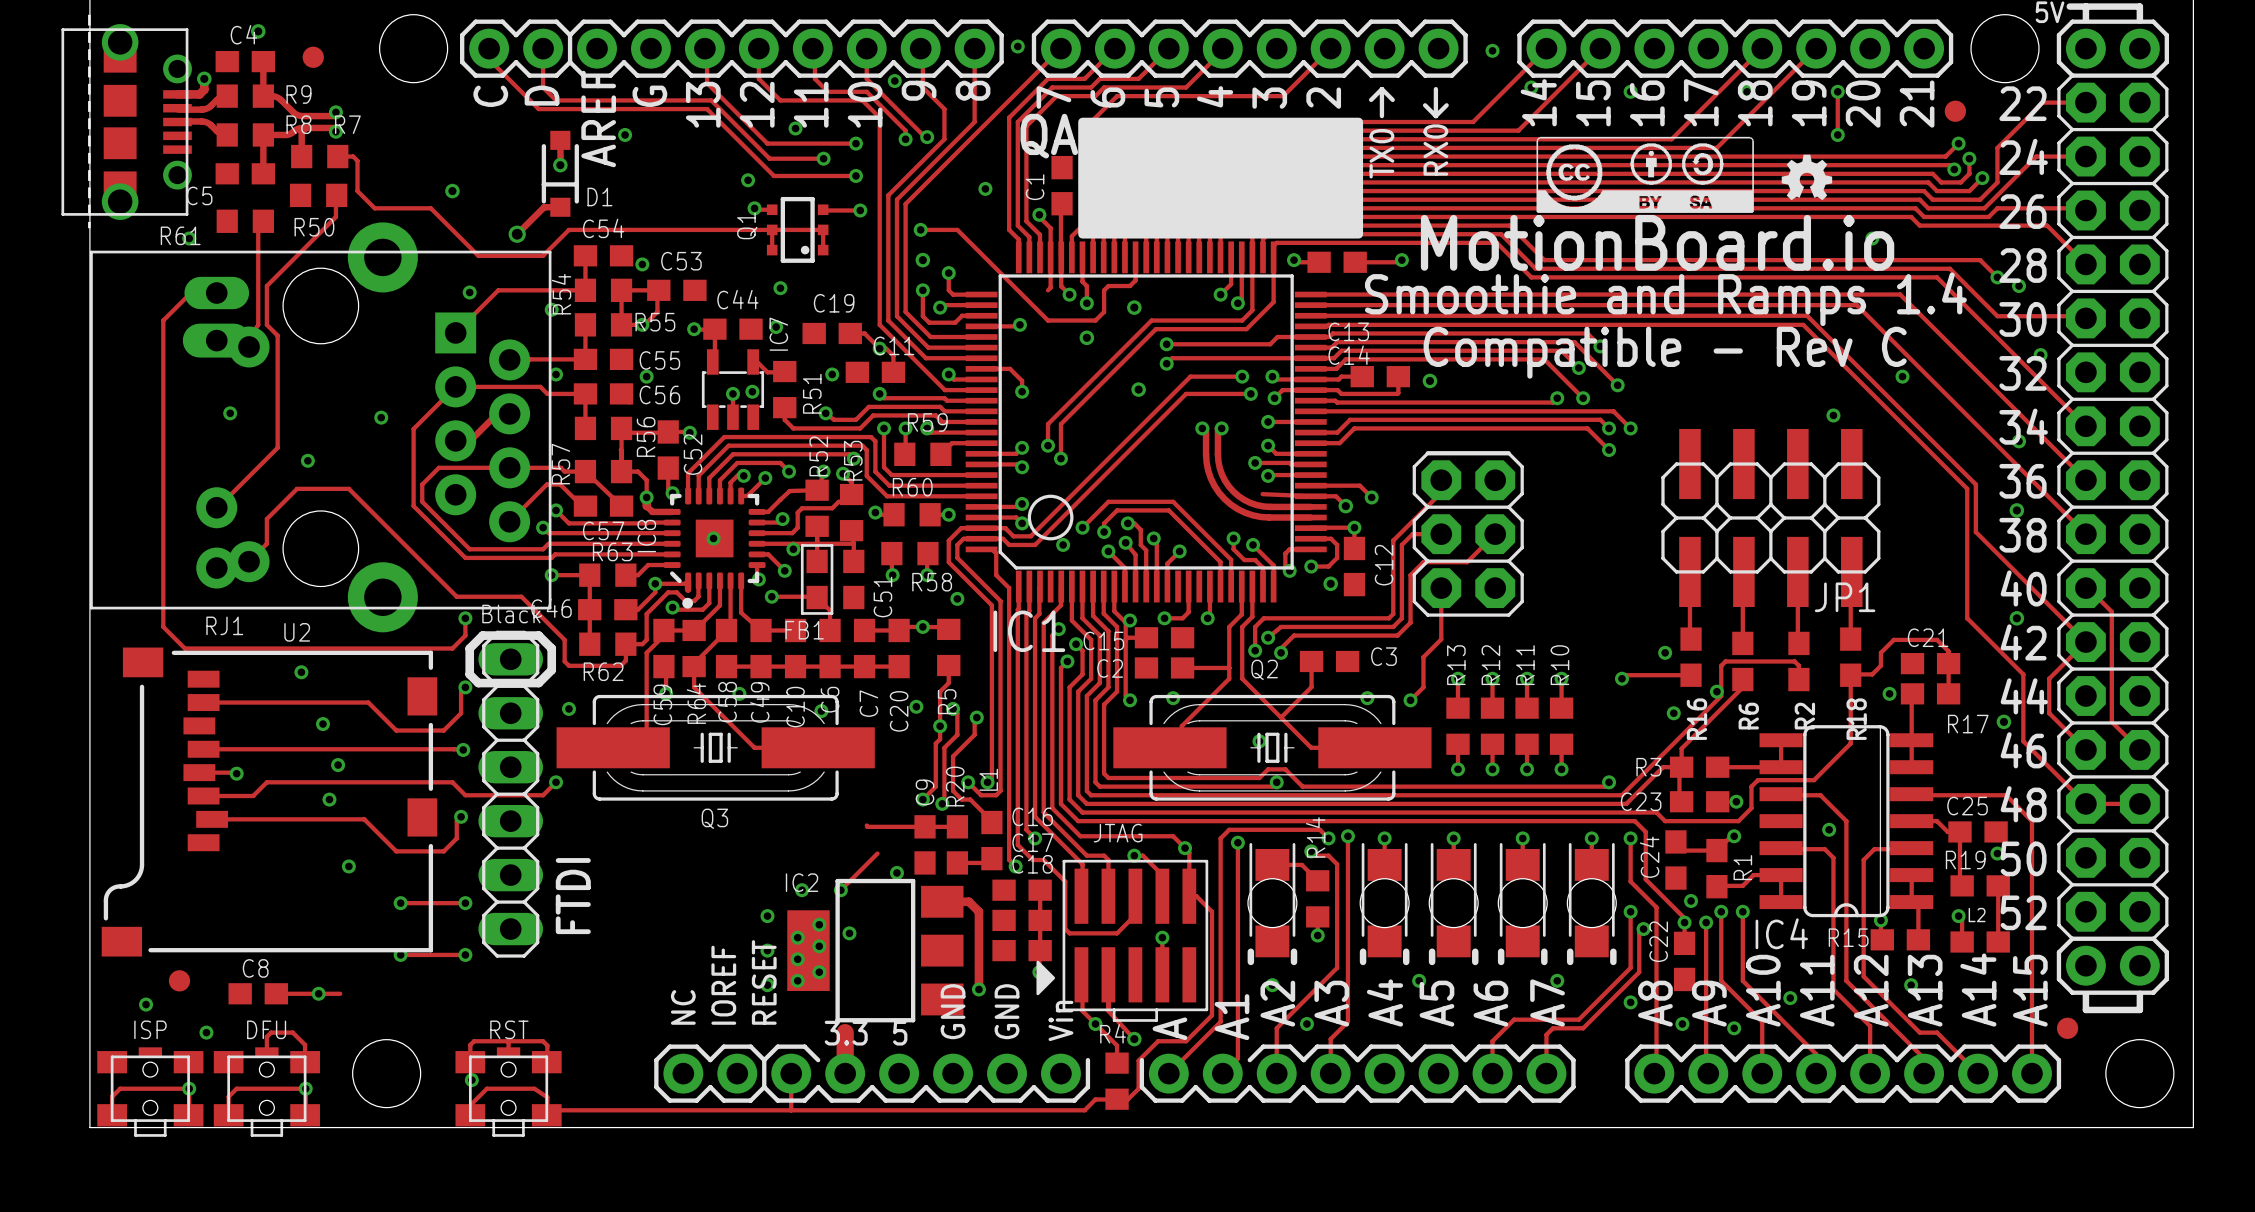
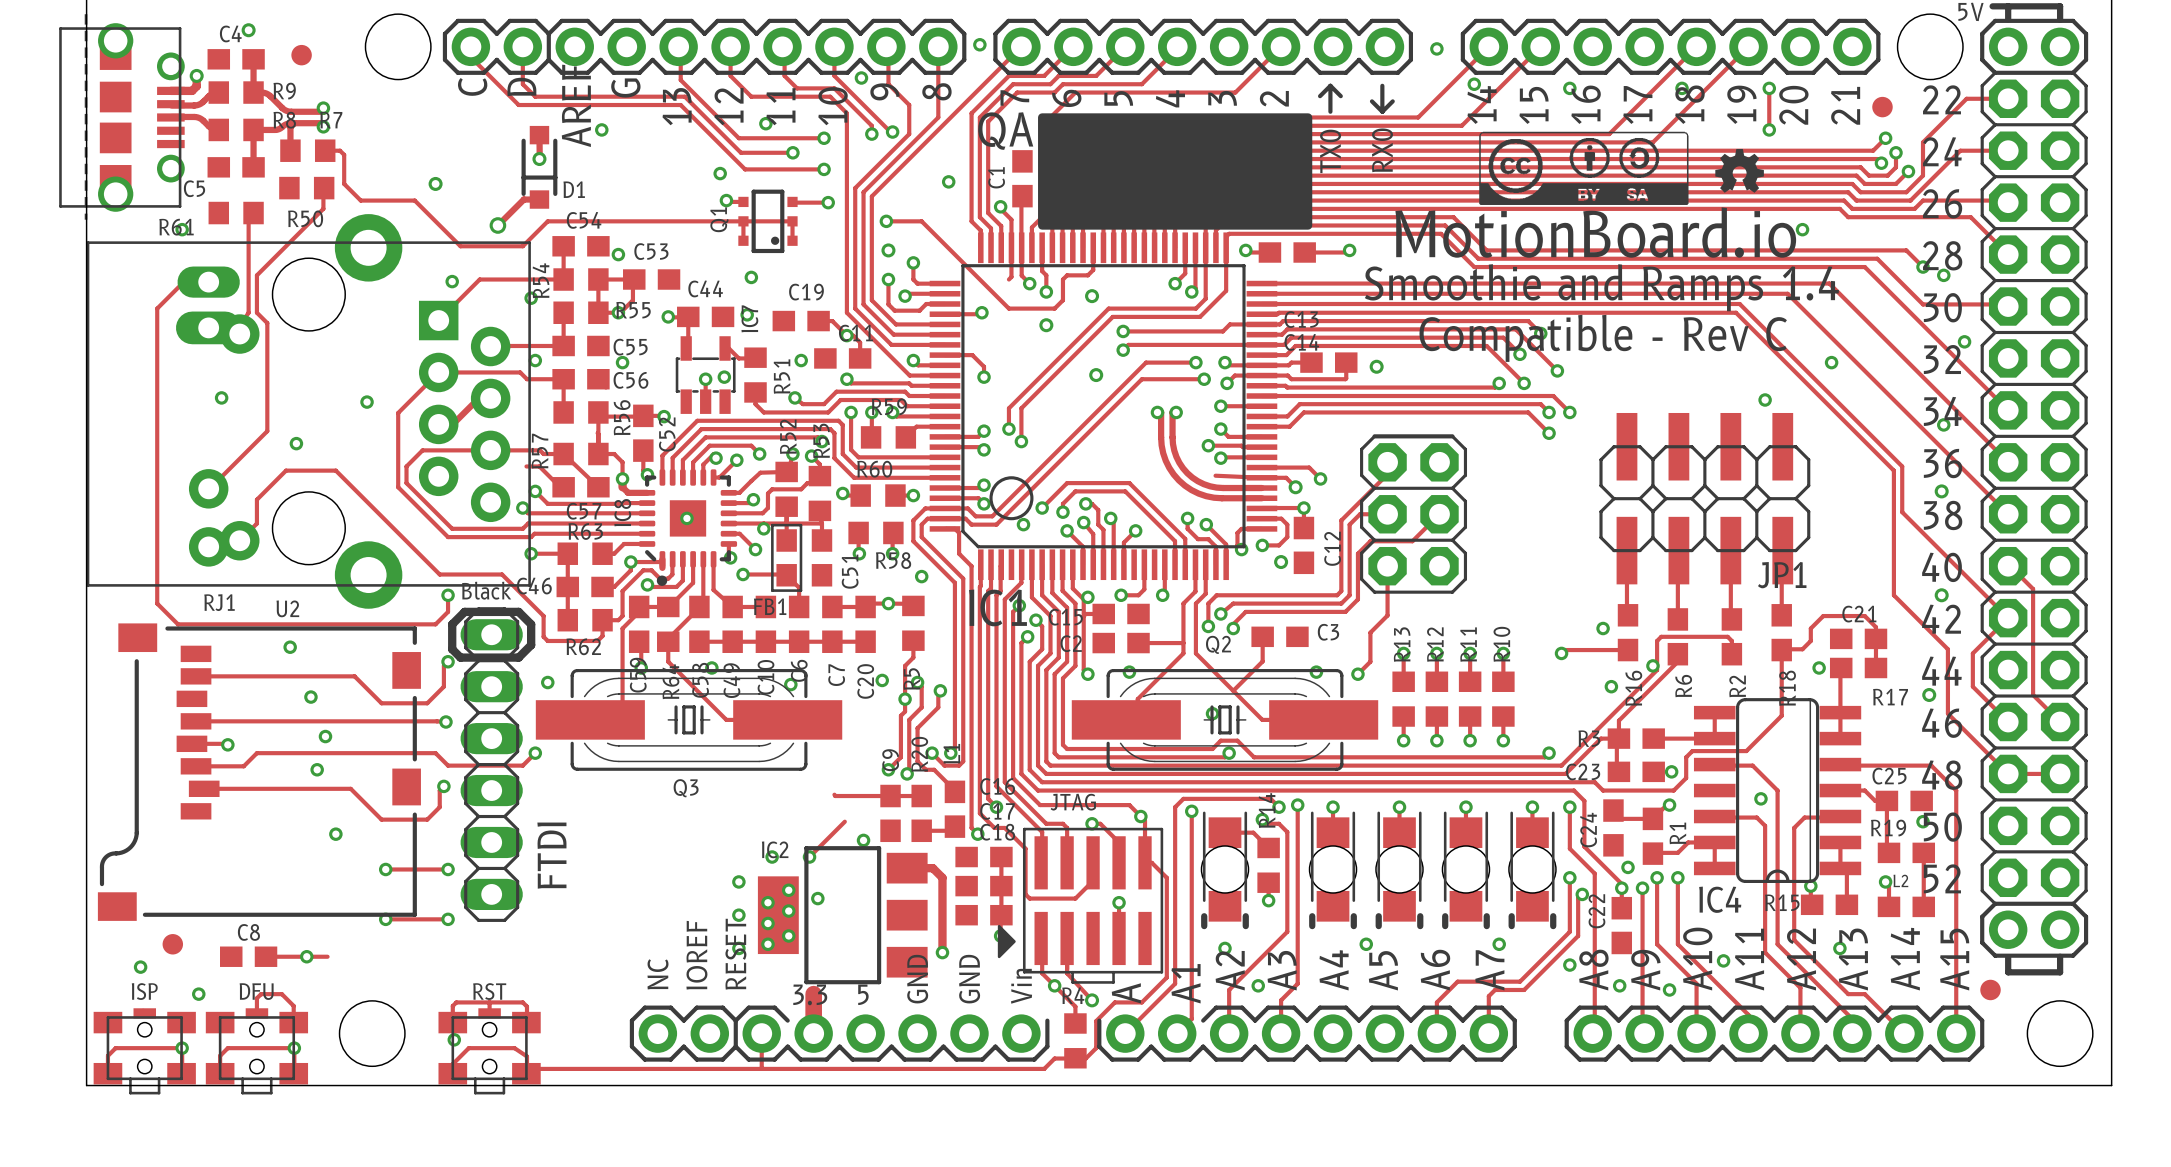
track: (546, 484) (509, 521) -> none

